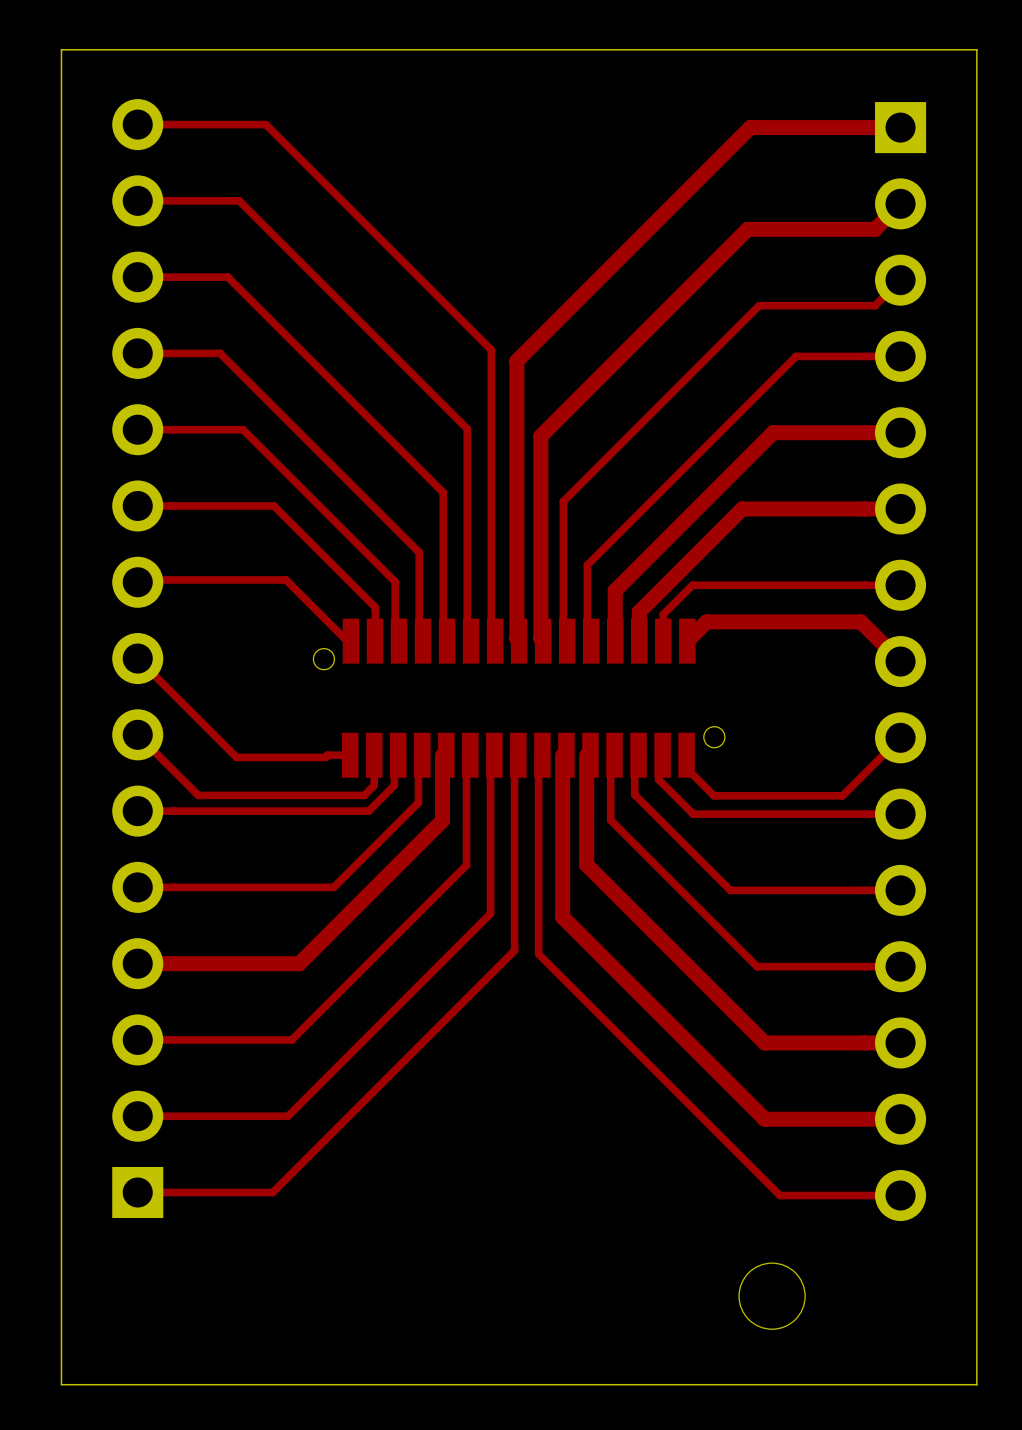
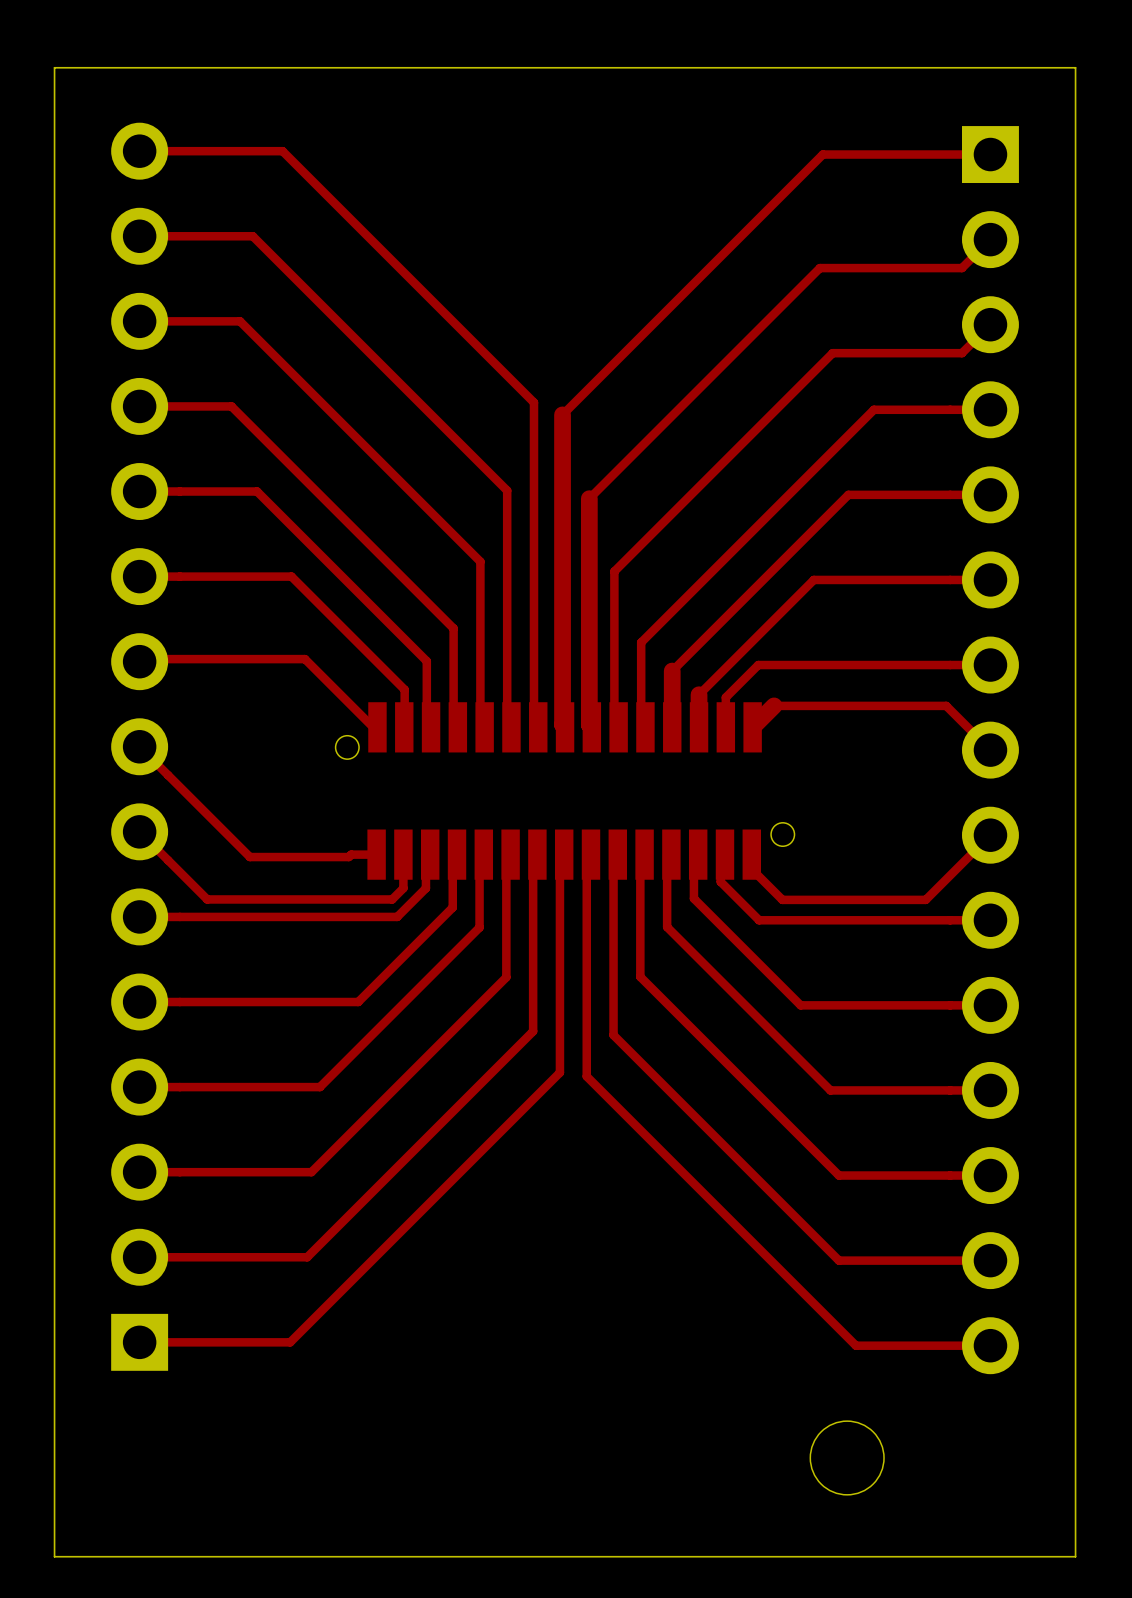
top track width: thick (900, 127) (750, 127) (516, 360) -> thin (990, 154) (822, 154) (562, 414)
top track width: thick (900, 203) (875, 229) (747, 229) (540, 436) -> thin (990, 239) (961, 268) (819, 268) (589, 498)
top track width: thick (900, 432) (773, 432) (615, 590) -> thin (990, 494) (848, 494) (672, 671)
top track width: thick (900, 508) (742, 508) (639, 611) -> thin (990, 579) (813, 579) (699, 694)
top track width: thick (706, 621) (860, 621) (900, 661) -> thin (774, 705) (946, 705) (990, 750)
top track width: thick (442, 755) (442, 820) (299, 963) (137, 963) -> thin (479, 854) (479, 927) (319, 1087) (139, 1087)
top track width: thick (562, 755) (562, 917) (764, 1119) (900, 1119) -> thin (613, 854) (613, 1035) (838, 1260) (990, 1260)
top track width: thick (586, 755) (586, 864) (764, 1042) (900, 1042) -> thin (640, 854) (640, 976) (838, 1175) (990, 1175)

